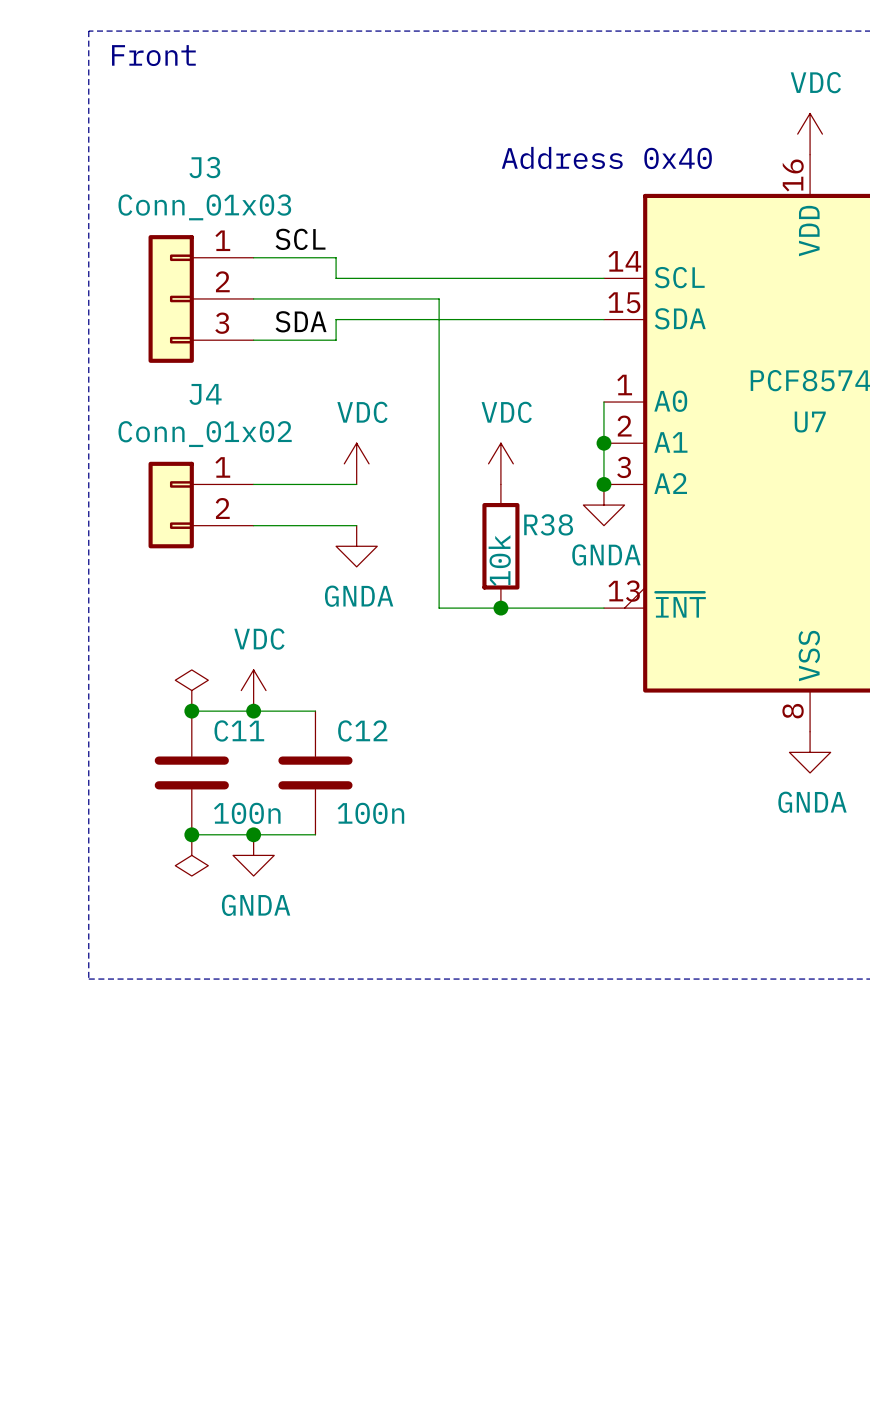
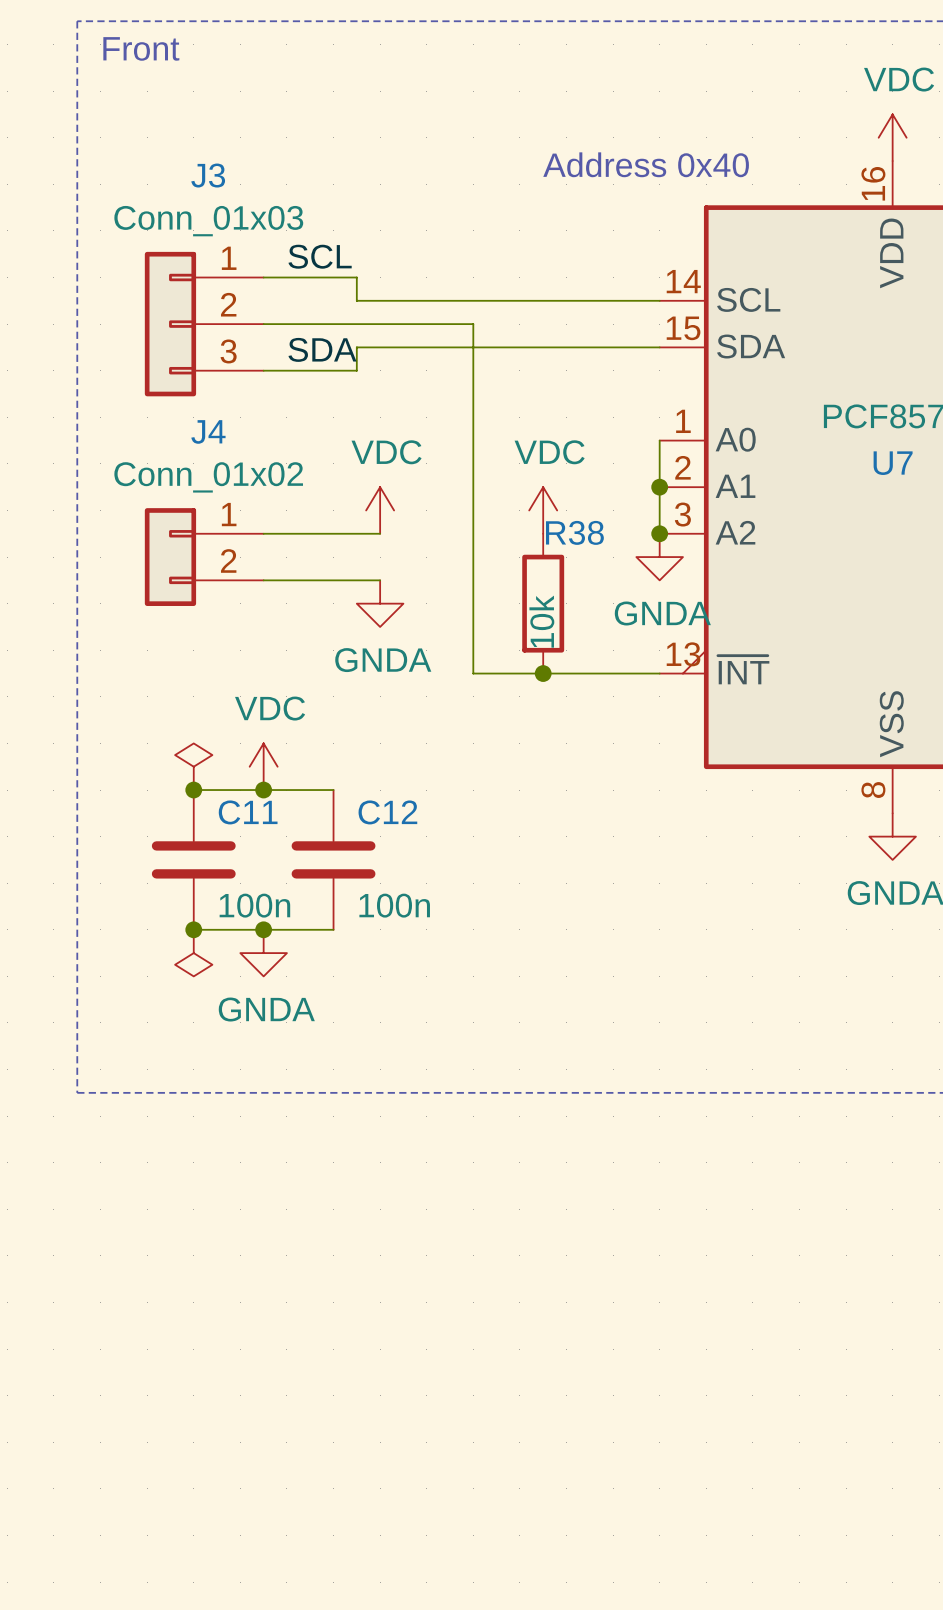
R38 name position: R38 (548, 524) -> R38 (574, 532)

